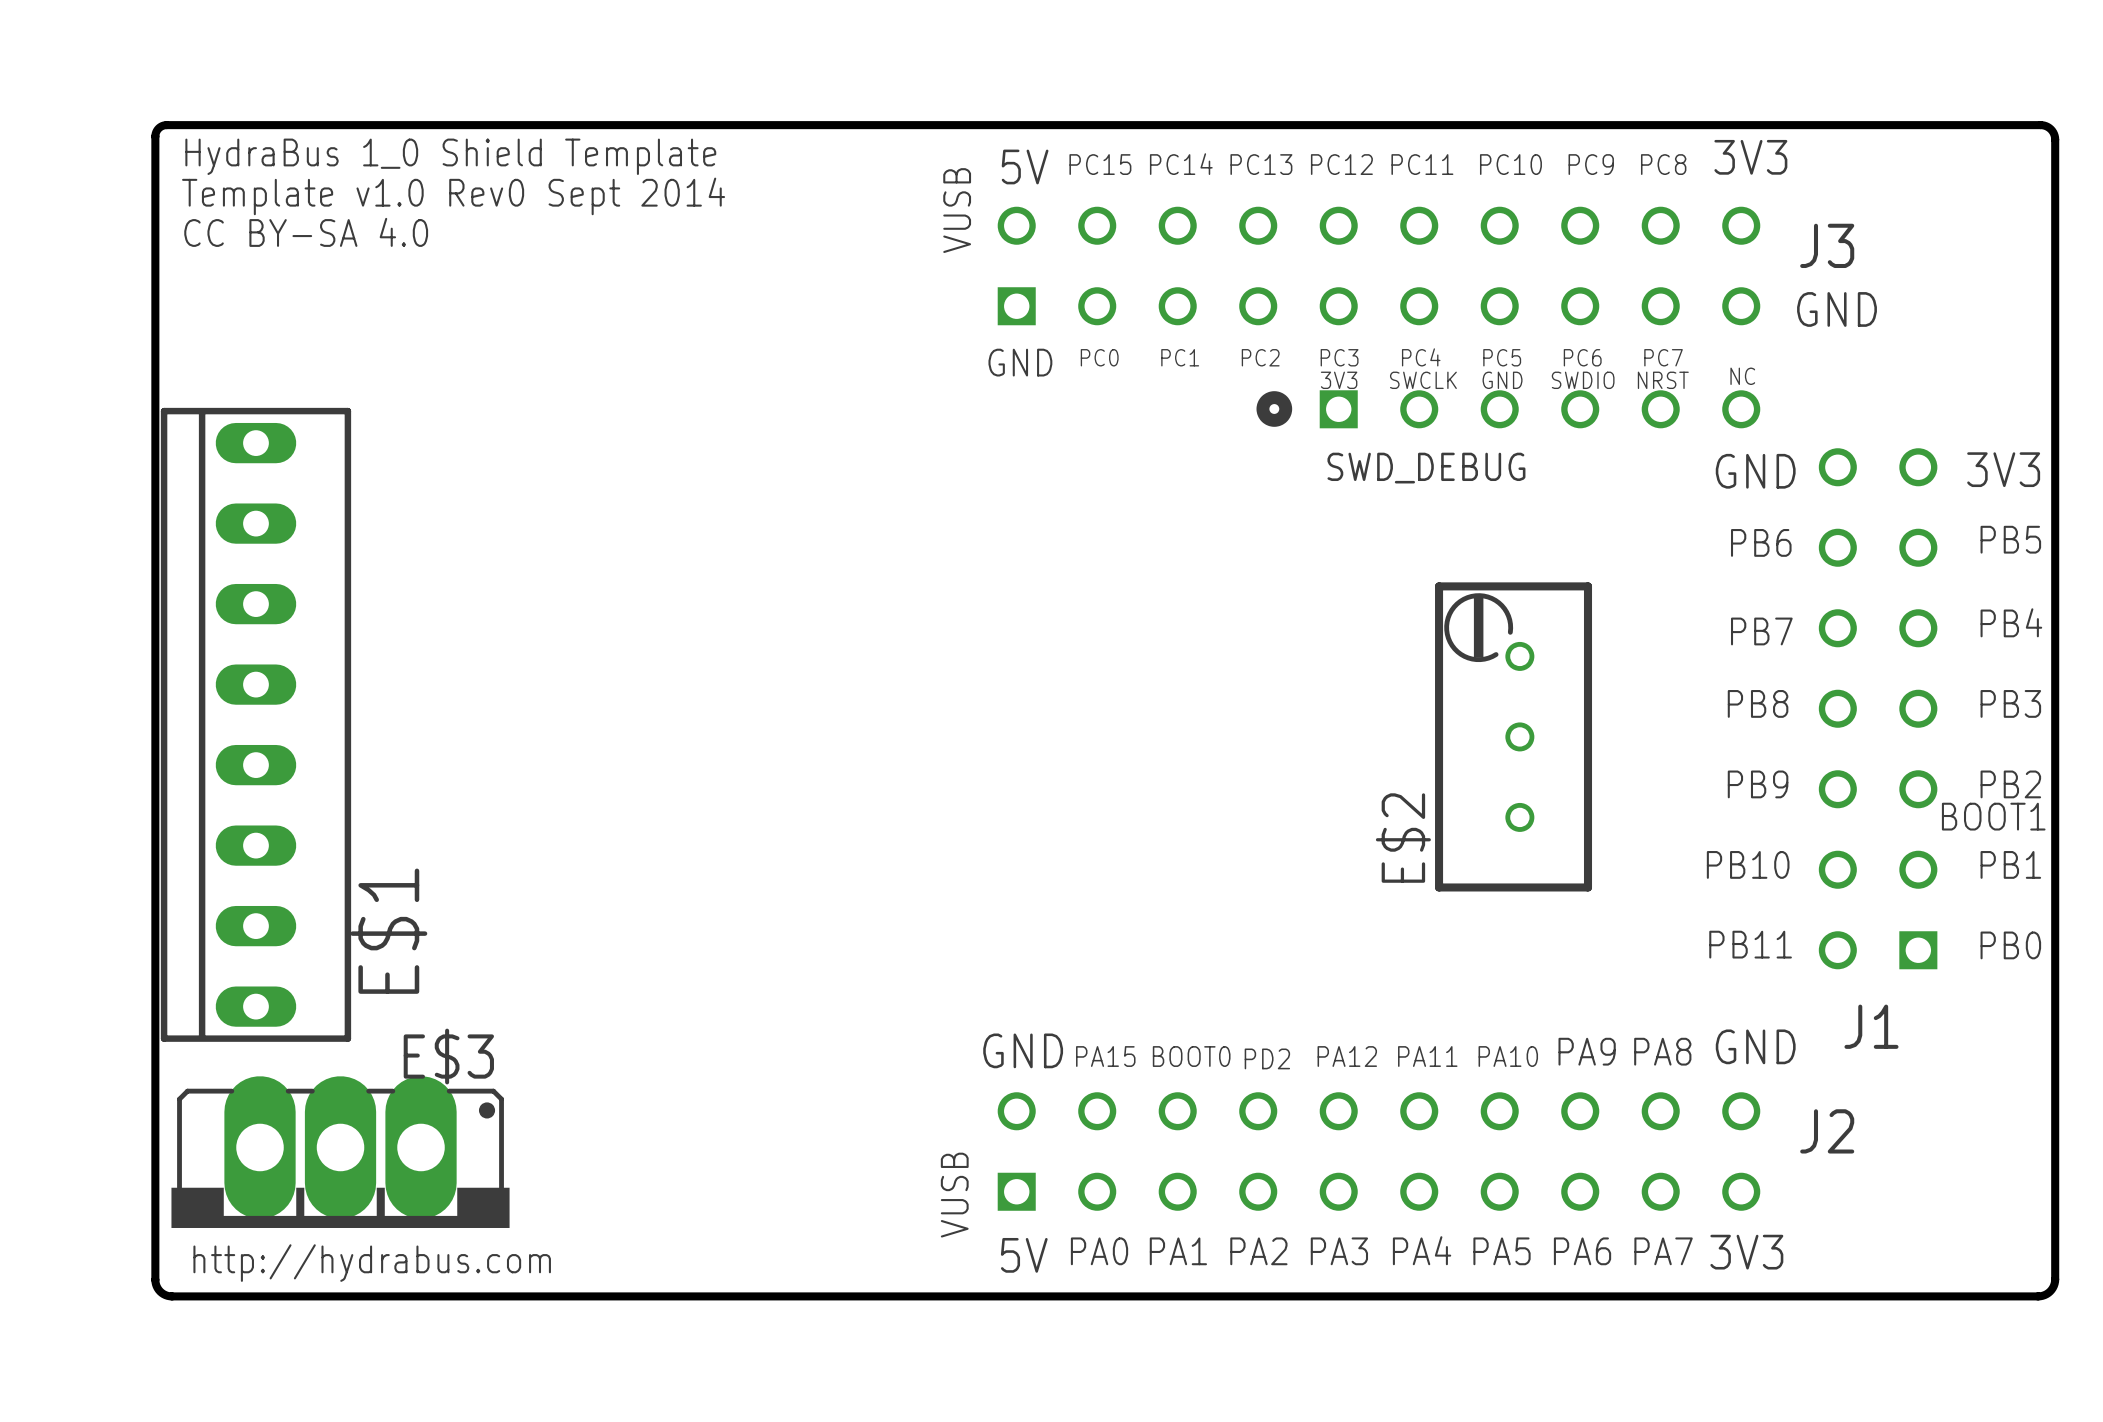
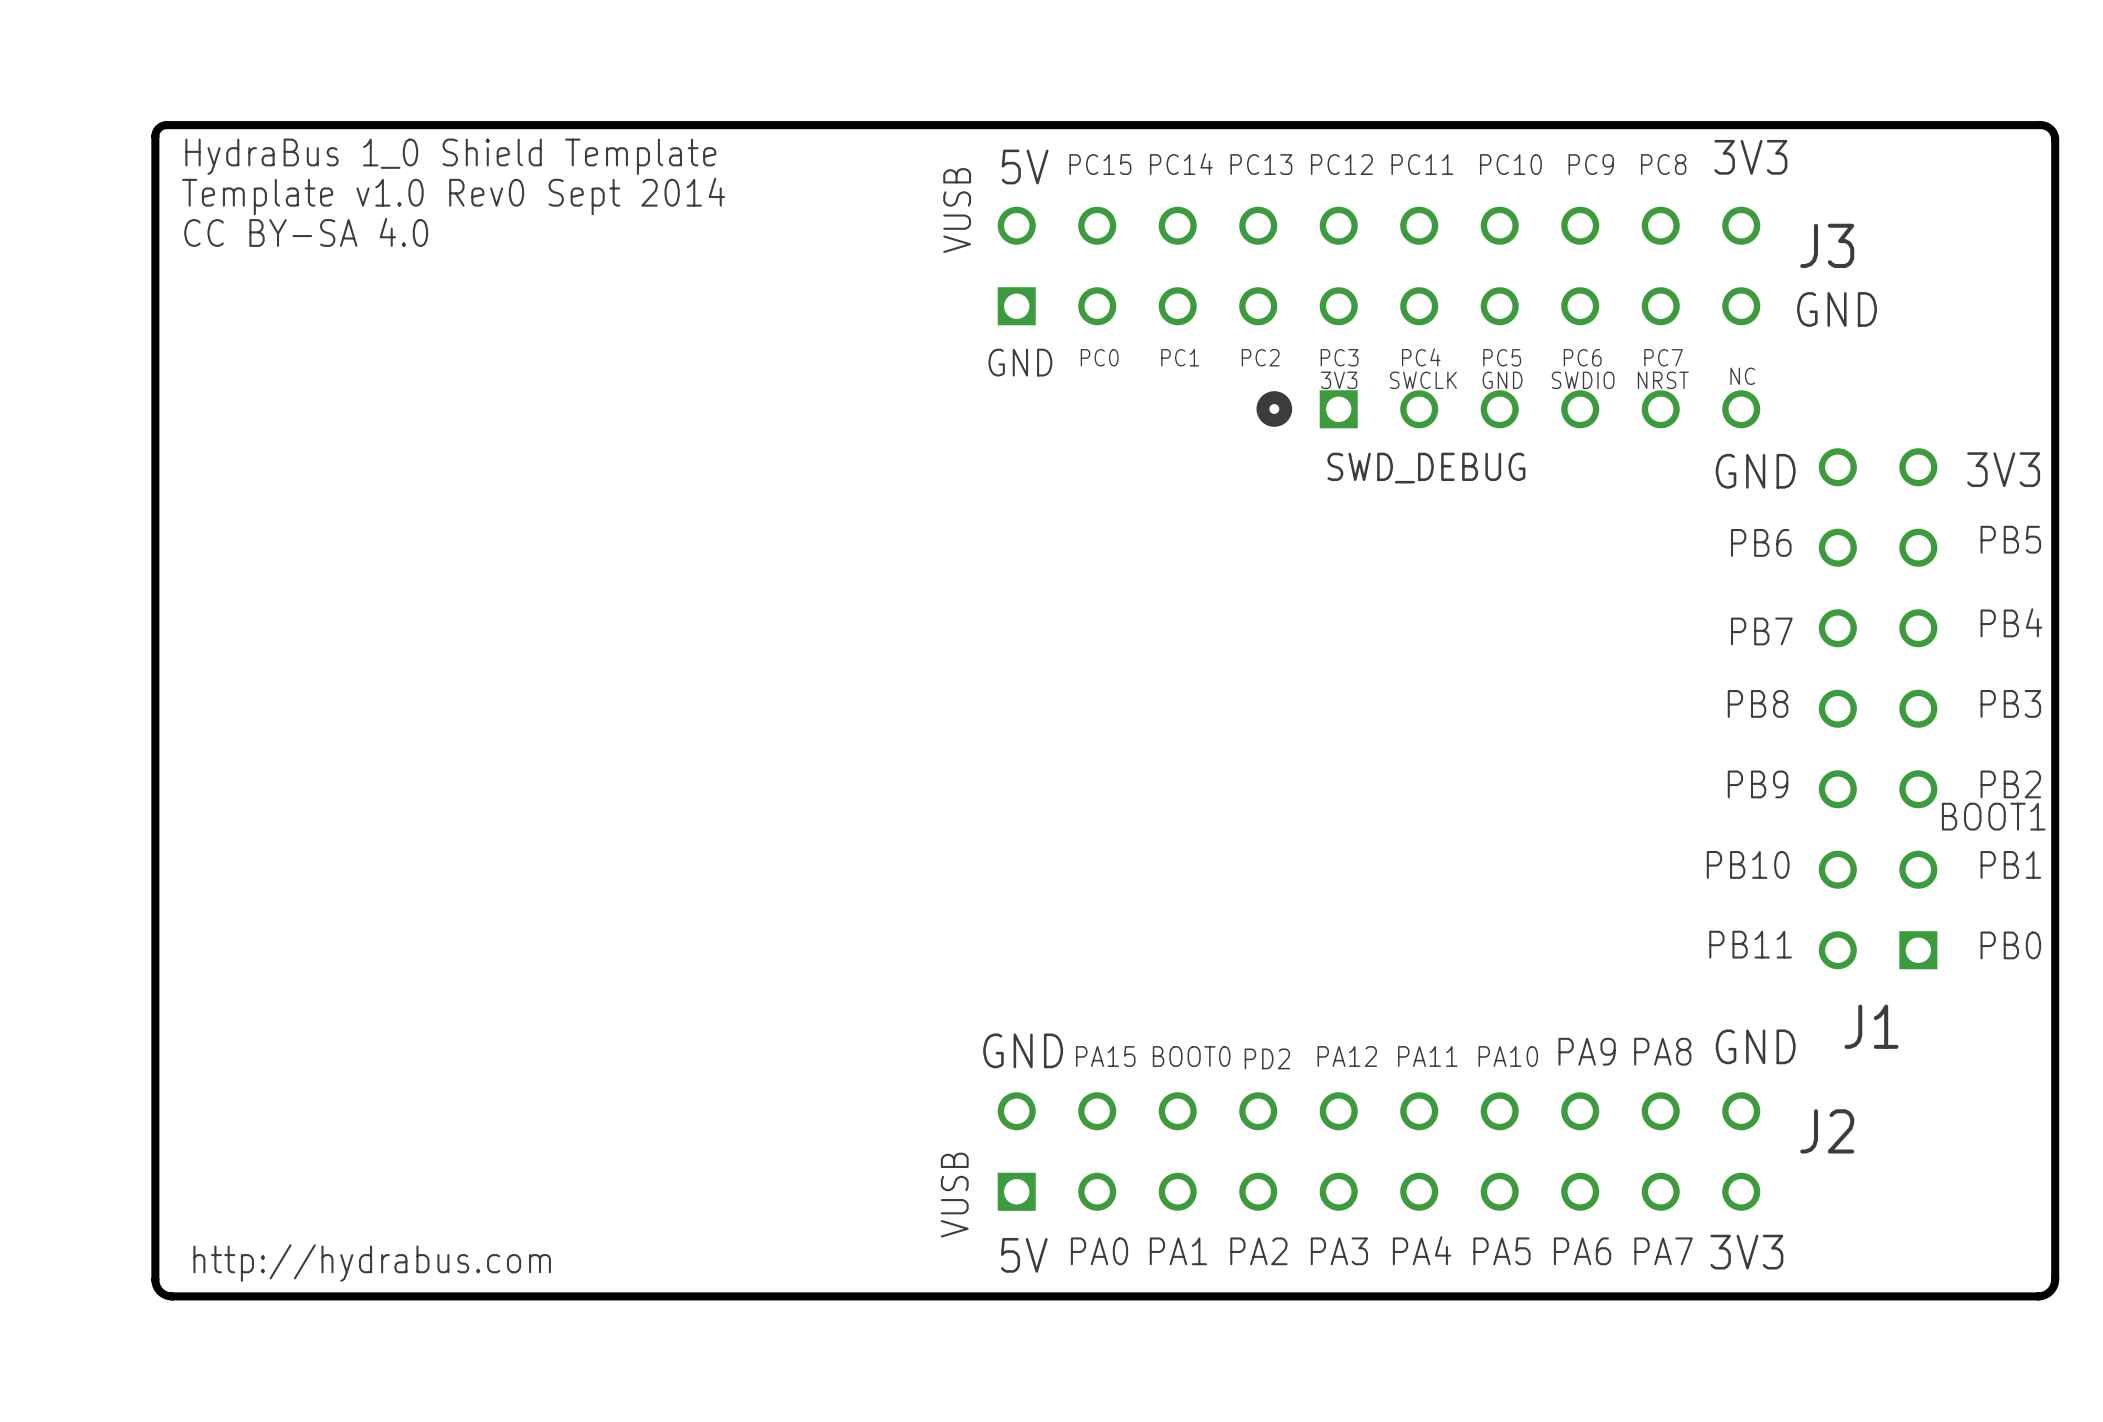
E$1: (255, 724) -> none
E$2: (1513, 736) -> none
E$3: (340, 1152) -> none

